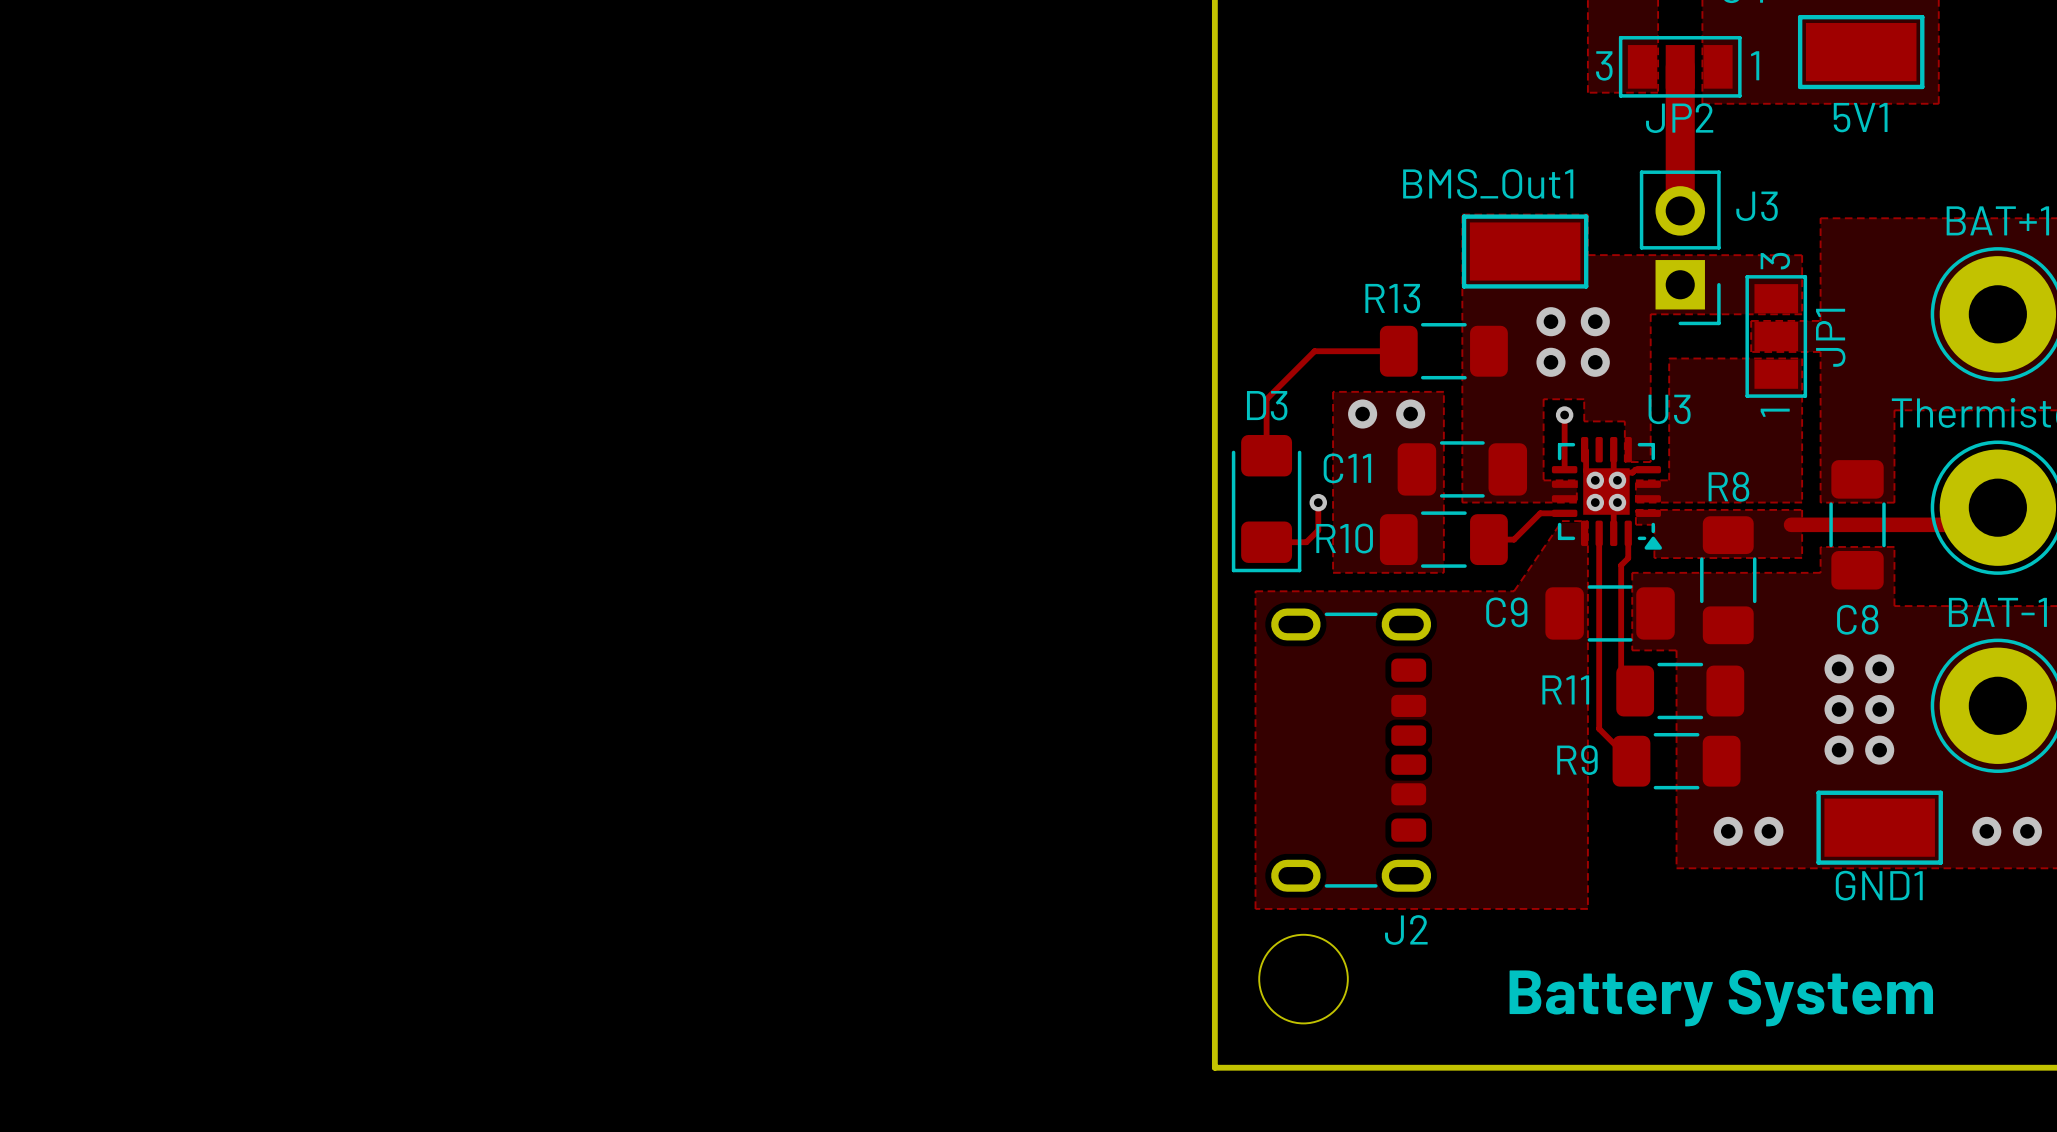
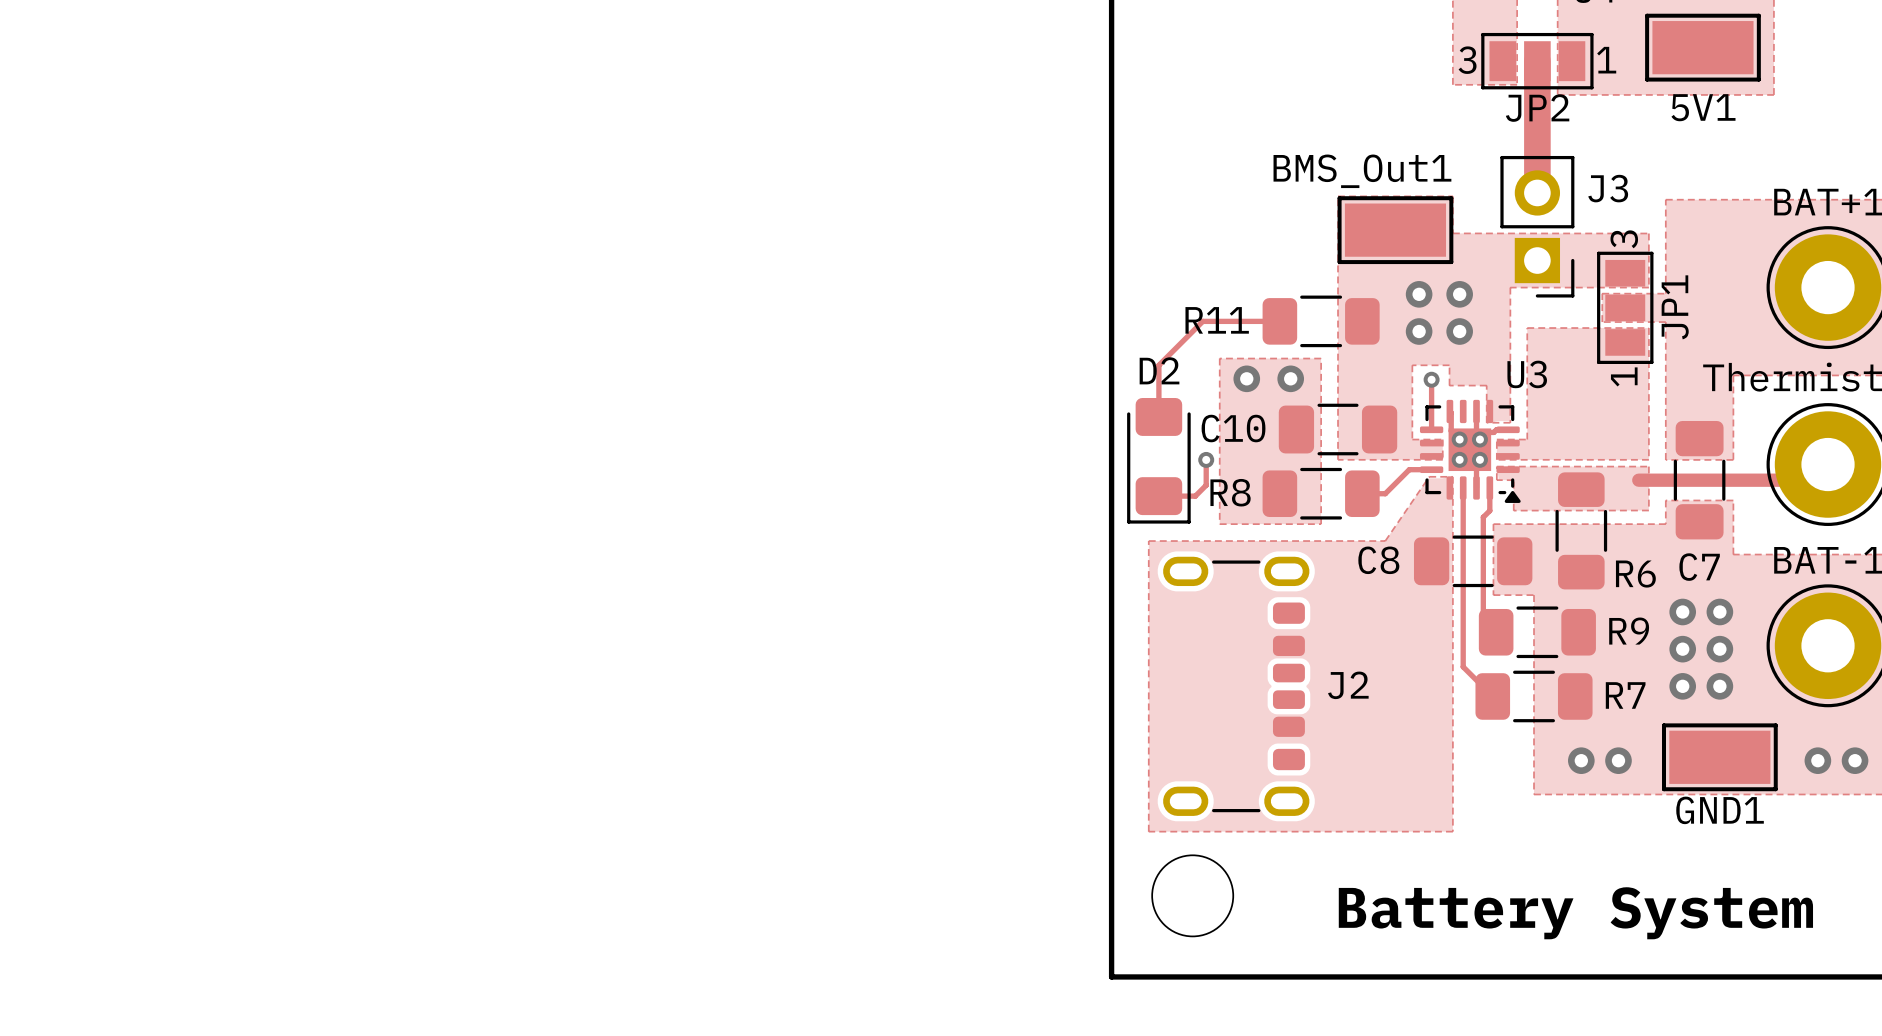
R13 name: R13 (1392, 298) -> R11 (1217, 320)
D3 name: D3 (1267, 405) -> D2 (1159, 370)
C11 name: C11 (1347, 468) -> C10 (1233, 428)
R8 name: R8 (1728, 486) -> R6 (1635, 574)
R10 name: R10 (1344, 538) -> R8 (1230, 492)
C9 name: C9 (1506, 612) -> C8 (1378, 560)
C8 name: C8 (1857, 619) -> C7 (1699, 567)
R11 name: R11 (1565, 689) -> R9 (1629, 631)
R9 name: R9 (1577, 760) -> R7 (1625, 695)
J2 name position: J2 (1406, 930) -> J2 (1348, 685)

